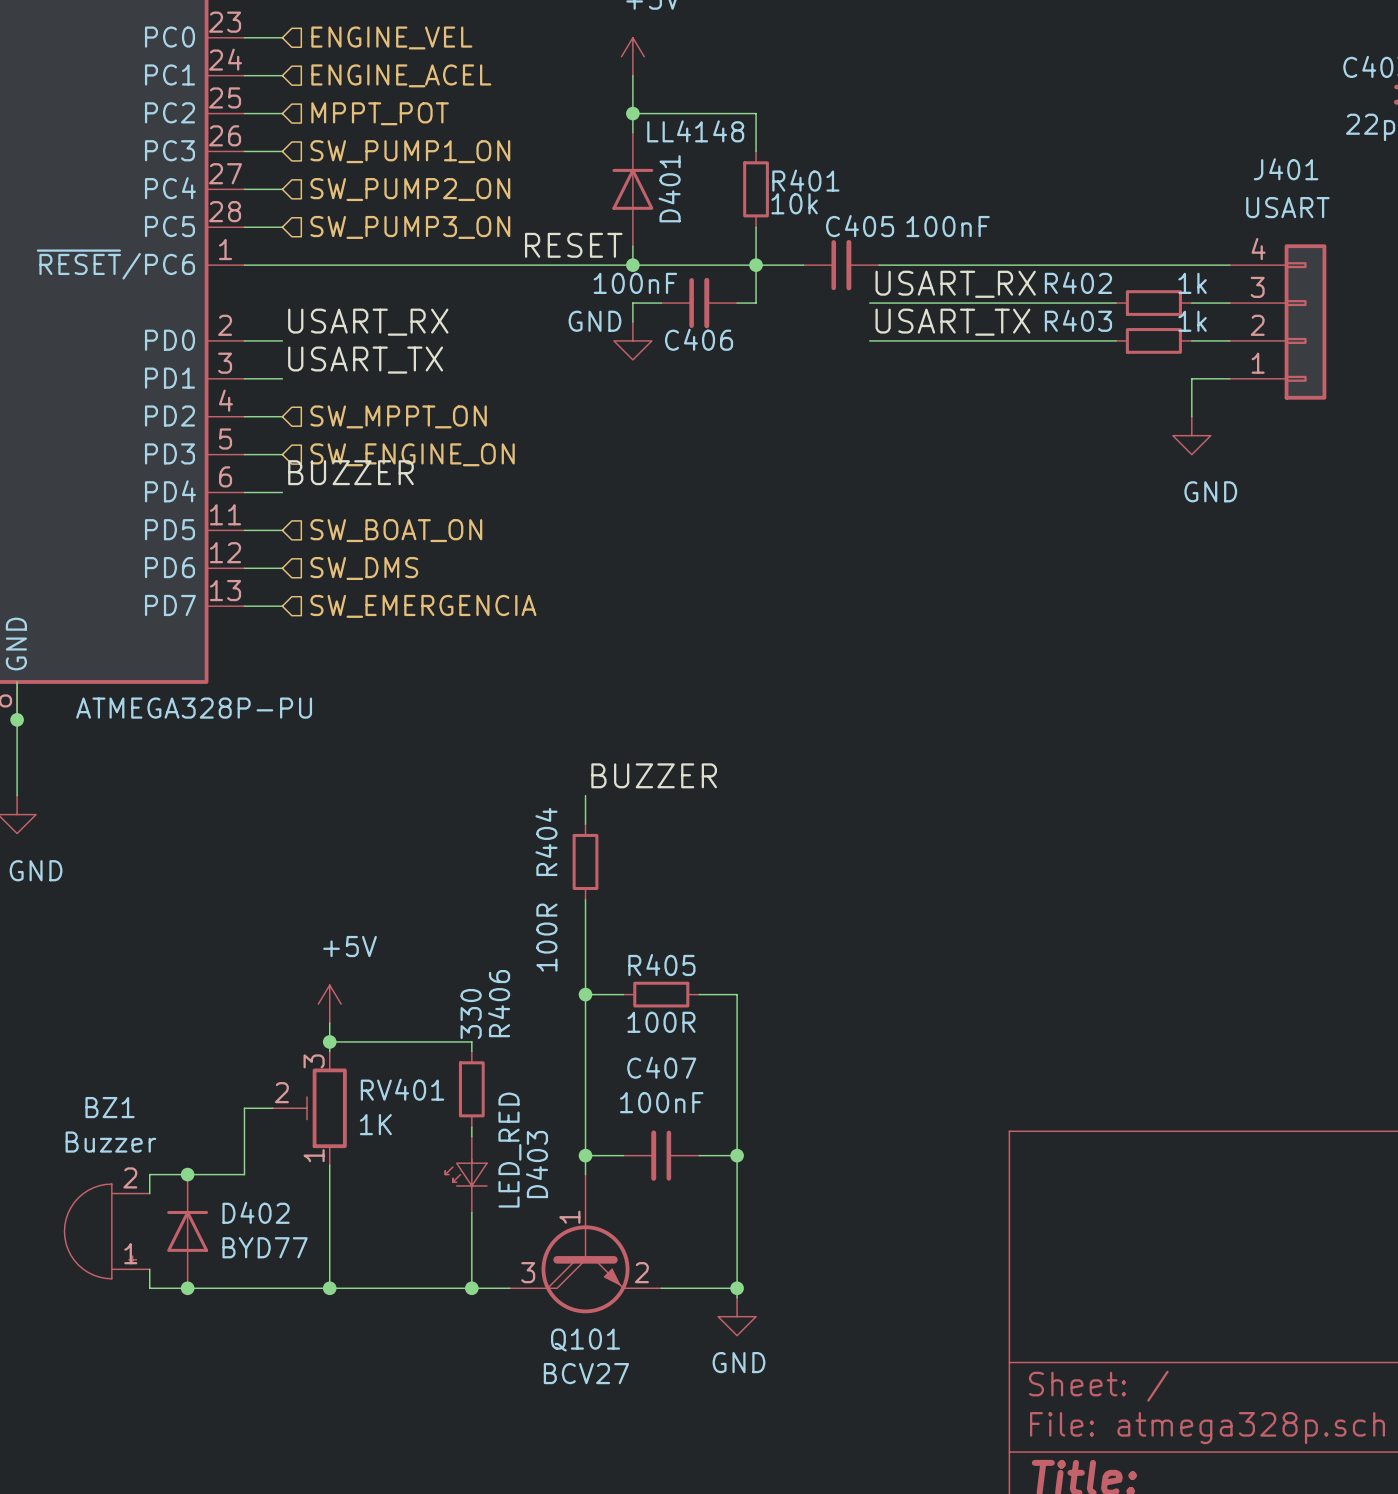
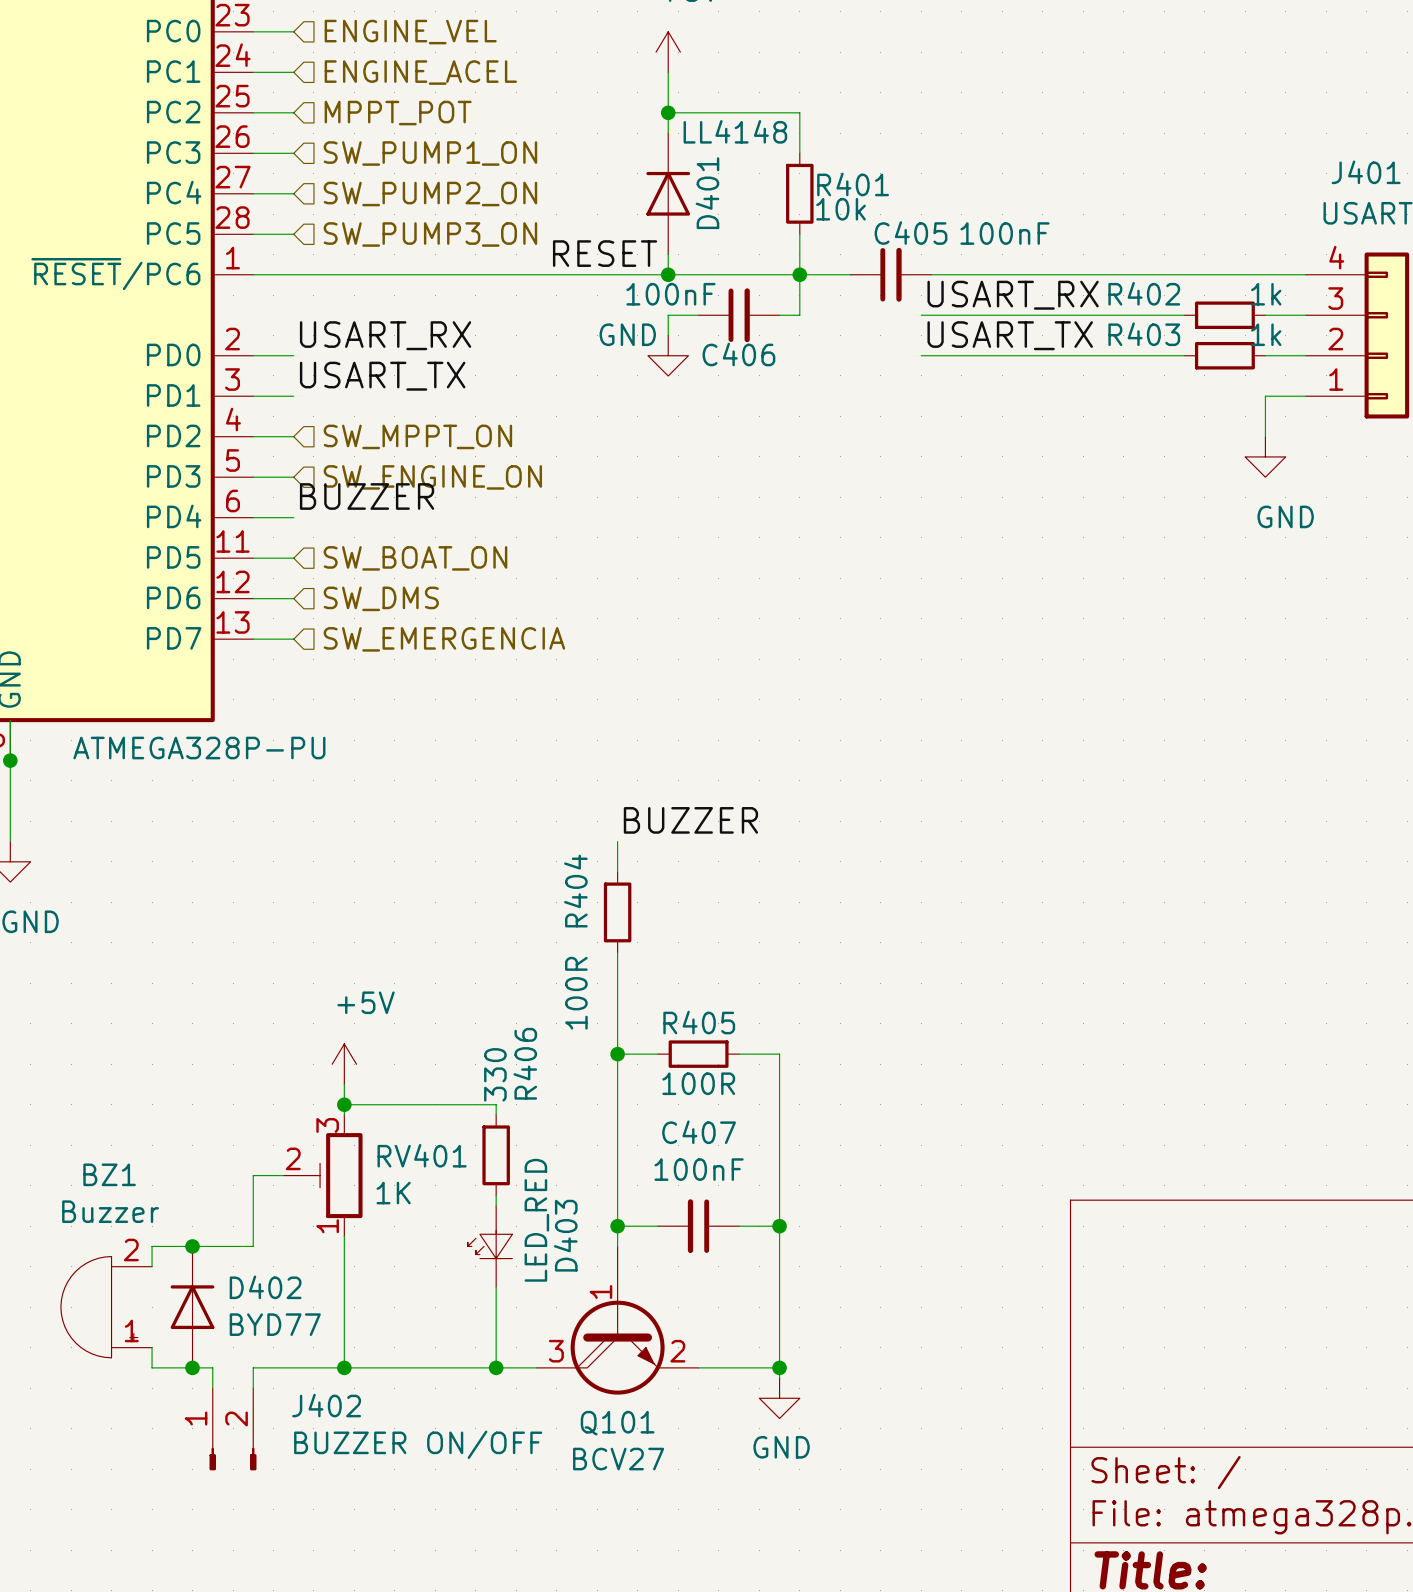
wire: (206, 1288) (244, 1288) -> (212, 1367) (212, 1388)
wire: none -> (253, 1367) (253, 1388)
J402: none -> BUZZER ON/OFF (233, 1429)

